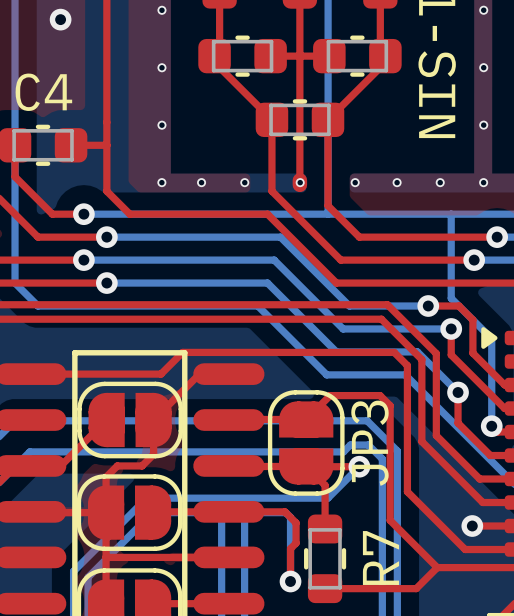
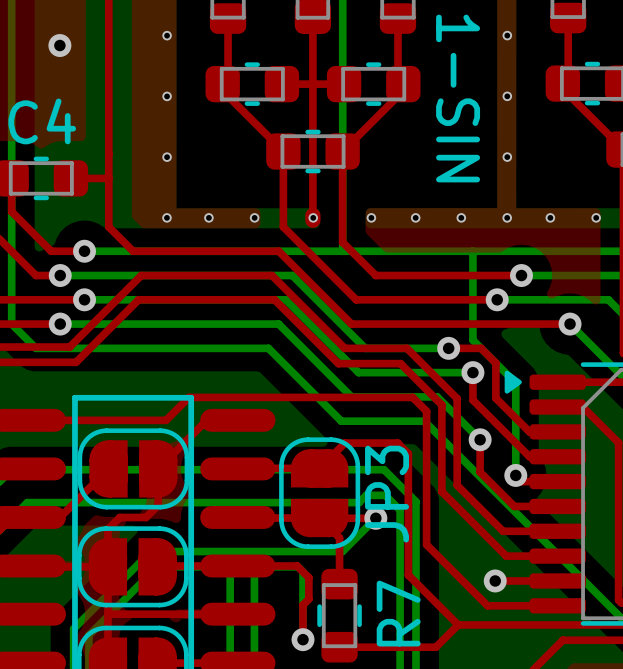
top track: (60, 237) (106, 237) -> none
bottom track: none -> (60, 275) (108, 275)
via: none -> (60, 275)
via: (106, 237) -> none
top track: (60, 283) (106, 283) -> none
bottom track: none -> (60, 324) (108, 324)
via: none -> (60, 324)
via: (106, 283) -> none
top track: (69, 304) (388, 306) -> (69, 347) (141, 275) (271, 275) (344, 348) (406, 348)
top track: (75, 319) (382, 320) -> (76, 362) (138, 299) (274, 299) (338, 363) (400, 363)

